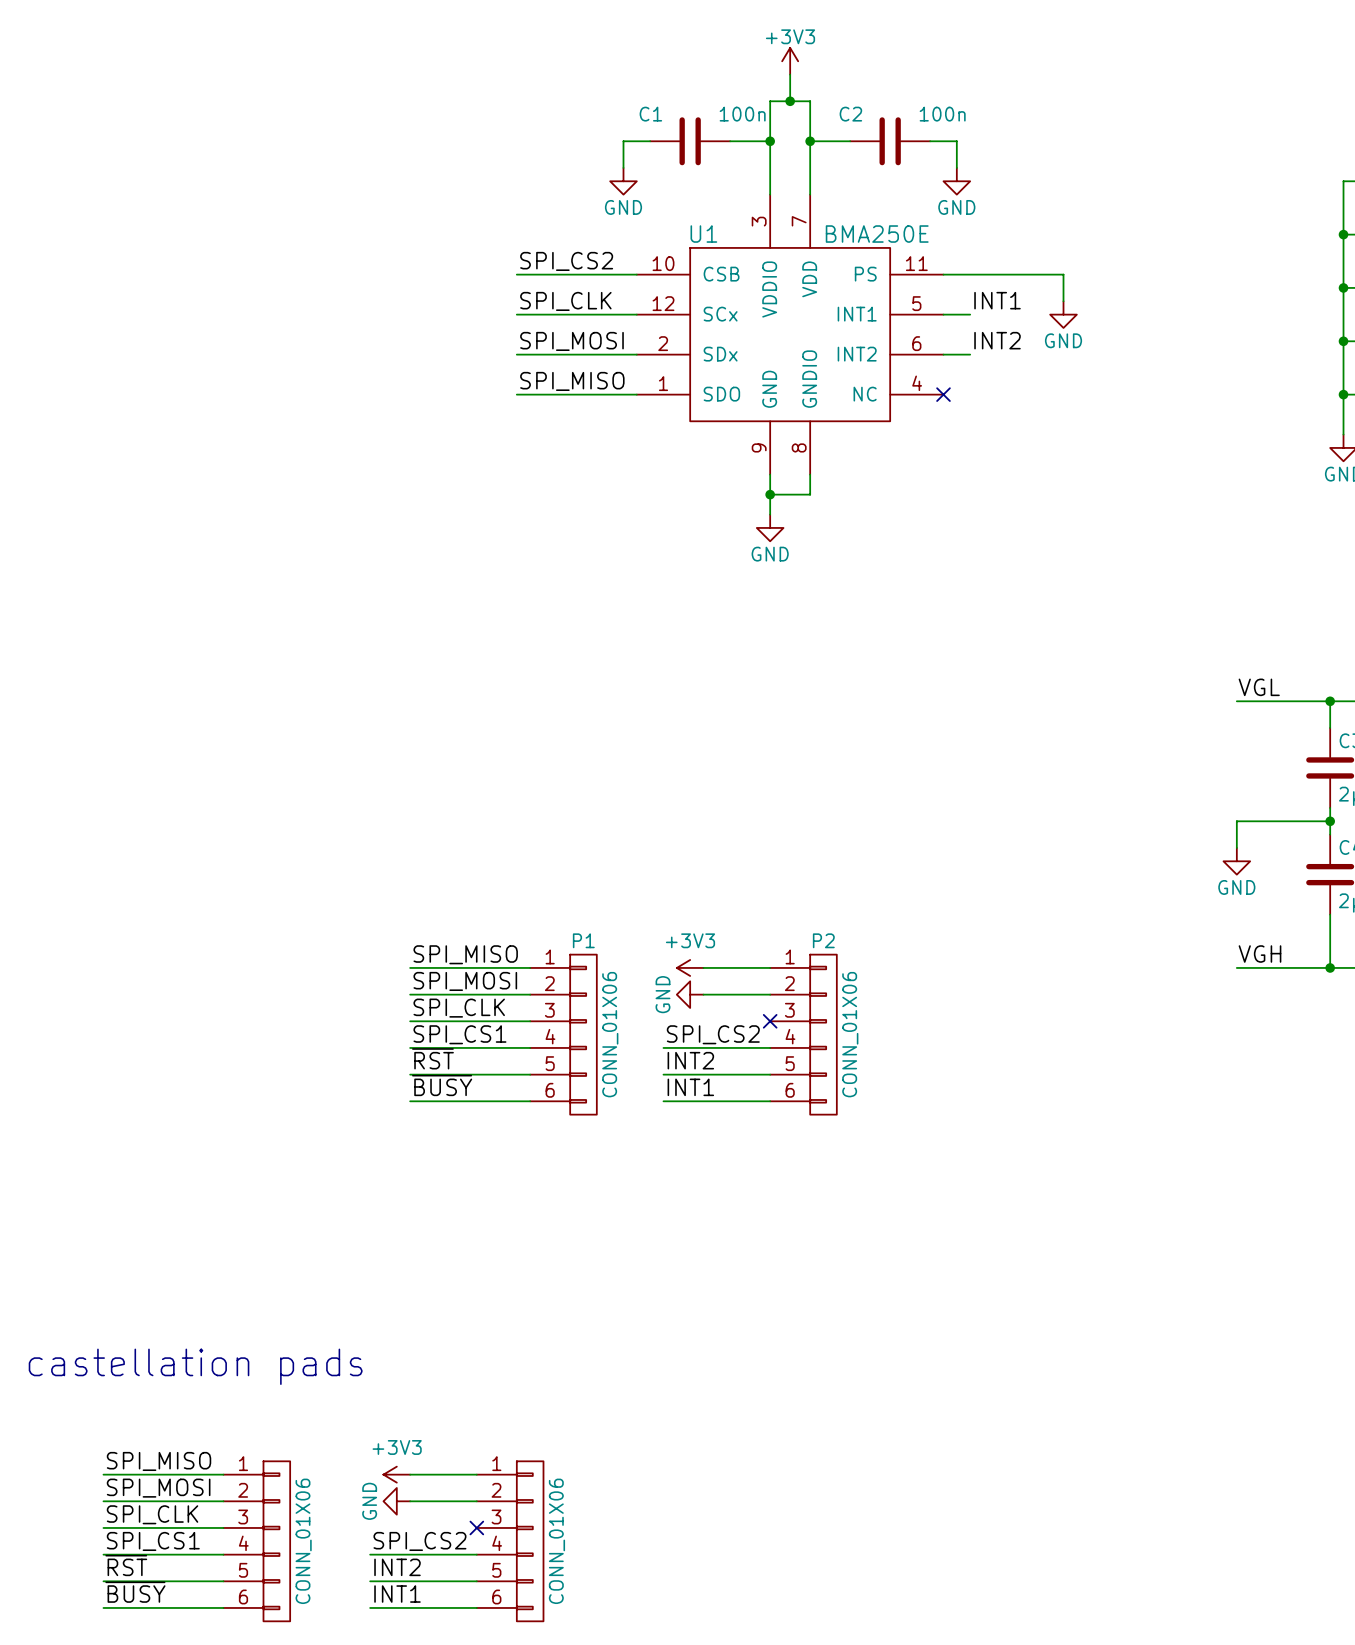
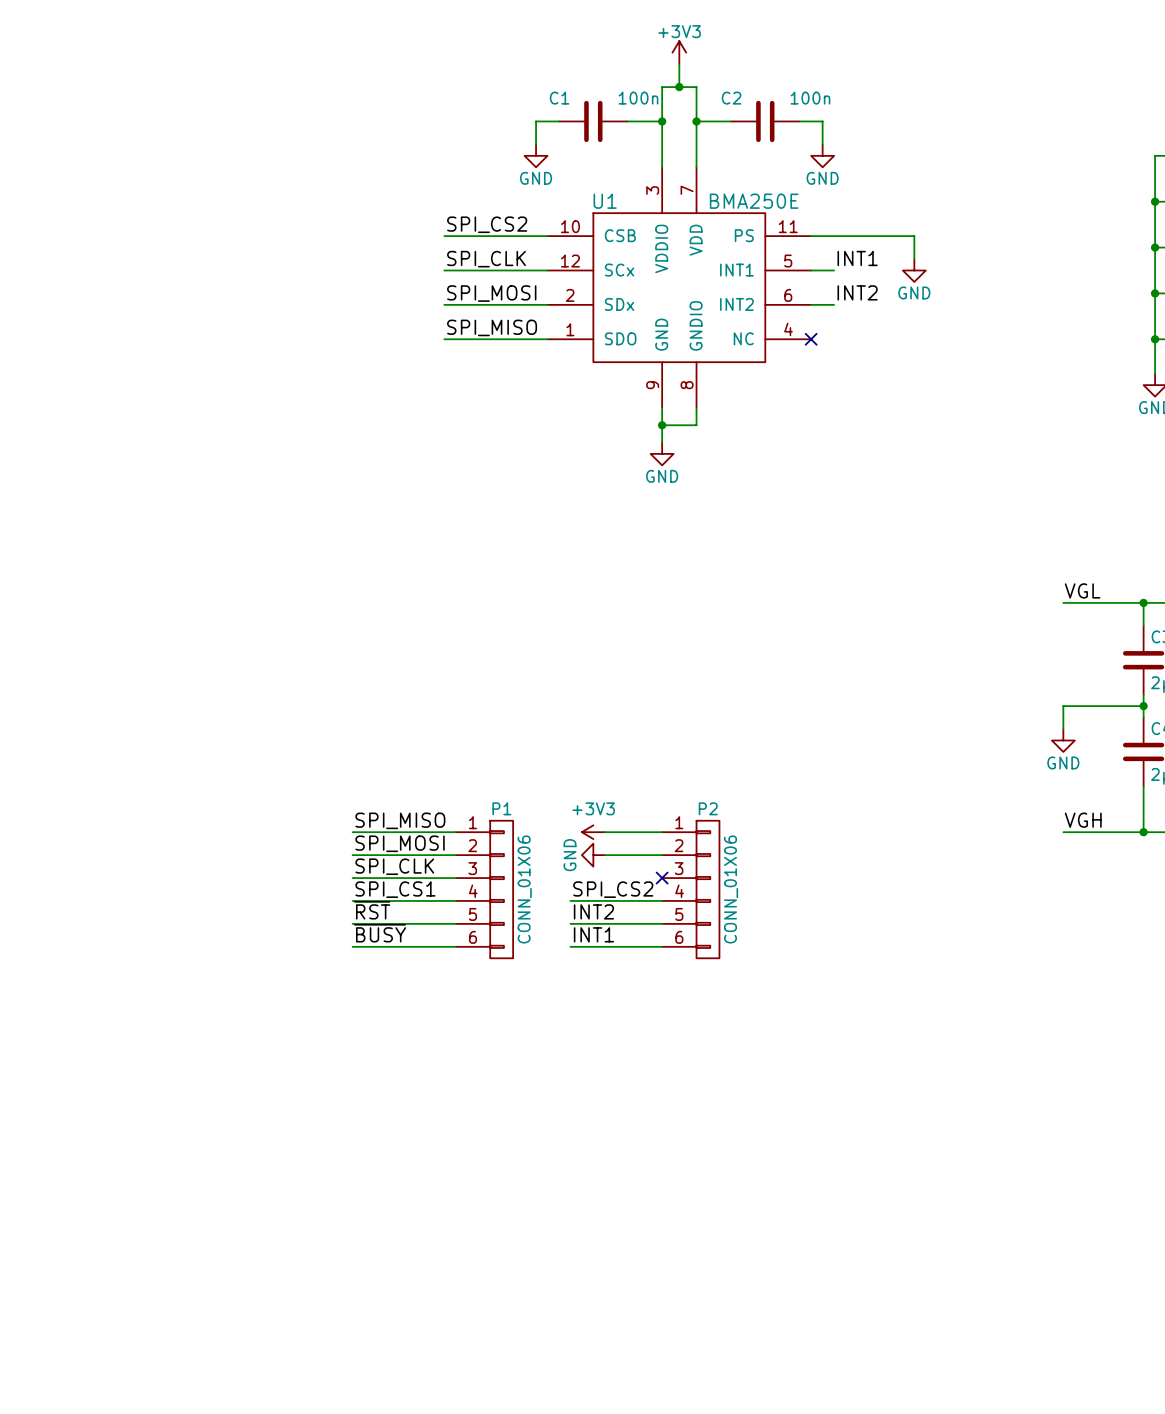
text: castellation pads (195, 1366) -> none
label: SPI_MISO (159, 1461) -> none
wire: (103, 1474) (223, 1474) -> none
power symbol: +3V3 (396, 1474) -> none
wire: (410, 1474) (476, 1474) -> none
label: SPI_MOSI (158, 1488) -> none
wire: (103, 1501) (223, 1501) -> none
power symbol: GND (396, 1501) -> none
wire: (410, 1501) (476, 1501) -> none
label: SPI_CLK (152, 1514) -> none
wire: (103, 1527) (223, 1527) -> none
no-connect mark: (476, 1527) -> none
label: SPI_CS1 (153, 1541) -> none
part: CONN_01X06 (256, 1541) -> none
label: SPI_CS2 (419, 1541) -> none
part: CONN_01X06 (510, 1541) -> none
wire: (103, 1554) (223, 1554) -> none
wire: (370, 1554) (476, 1554) -> none
label: ~{RST} (126, 1565) -> none
label: INT2 (397, 1567) -> none
wire: (103, 1581) (223, 1581) -> none
wire: (370, 1581) (476, 1581) -> none
label: ~{BUSY} (135, 1592) -> none
label: INT1 (397, 1594) -> none
wire: (103, 1607) (223, 1607) -> none
wire: (370, 1607) (476, 1607) -> none

